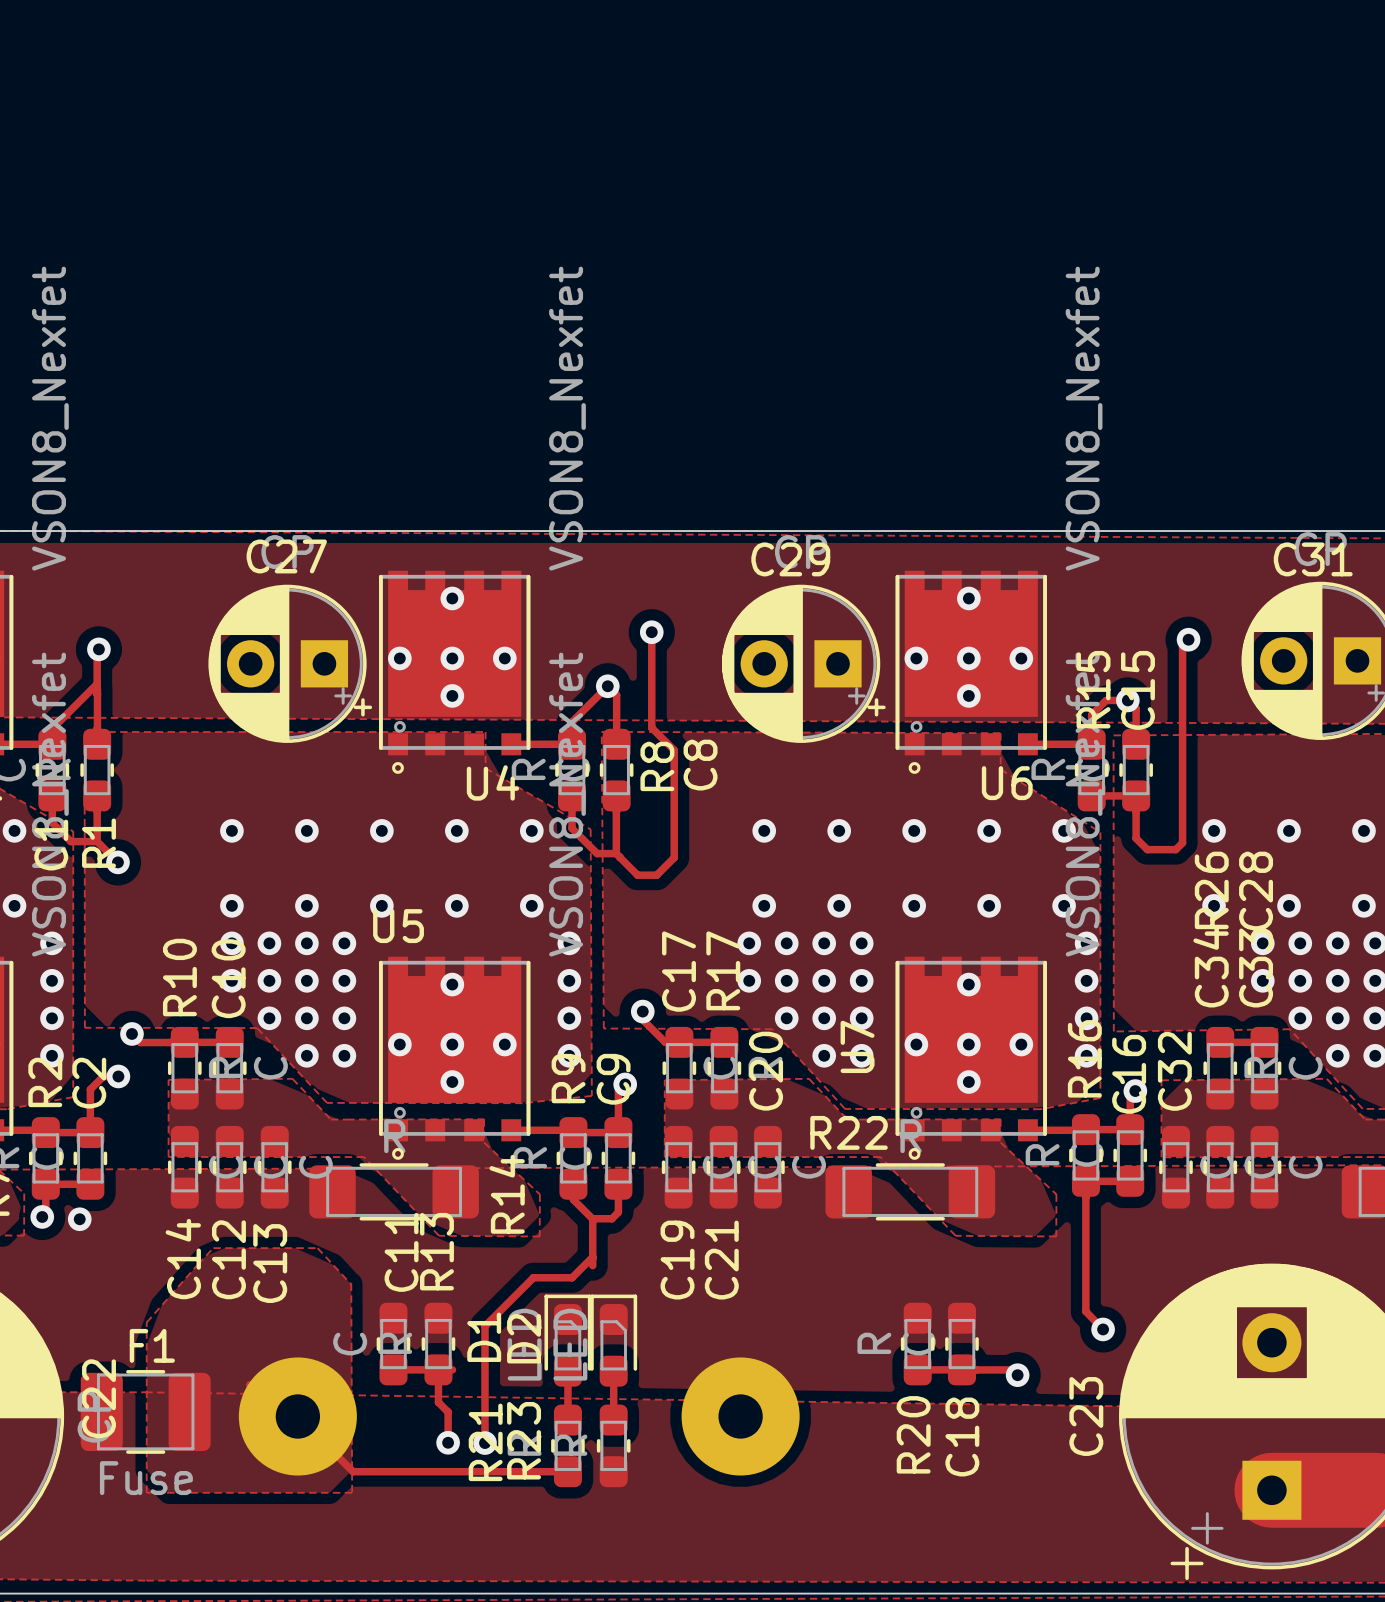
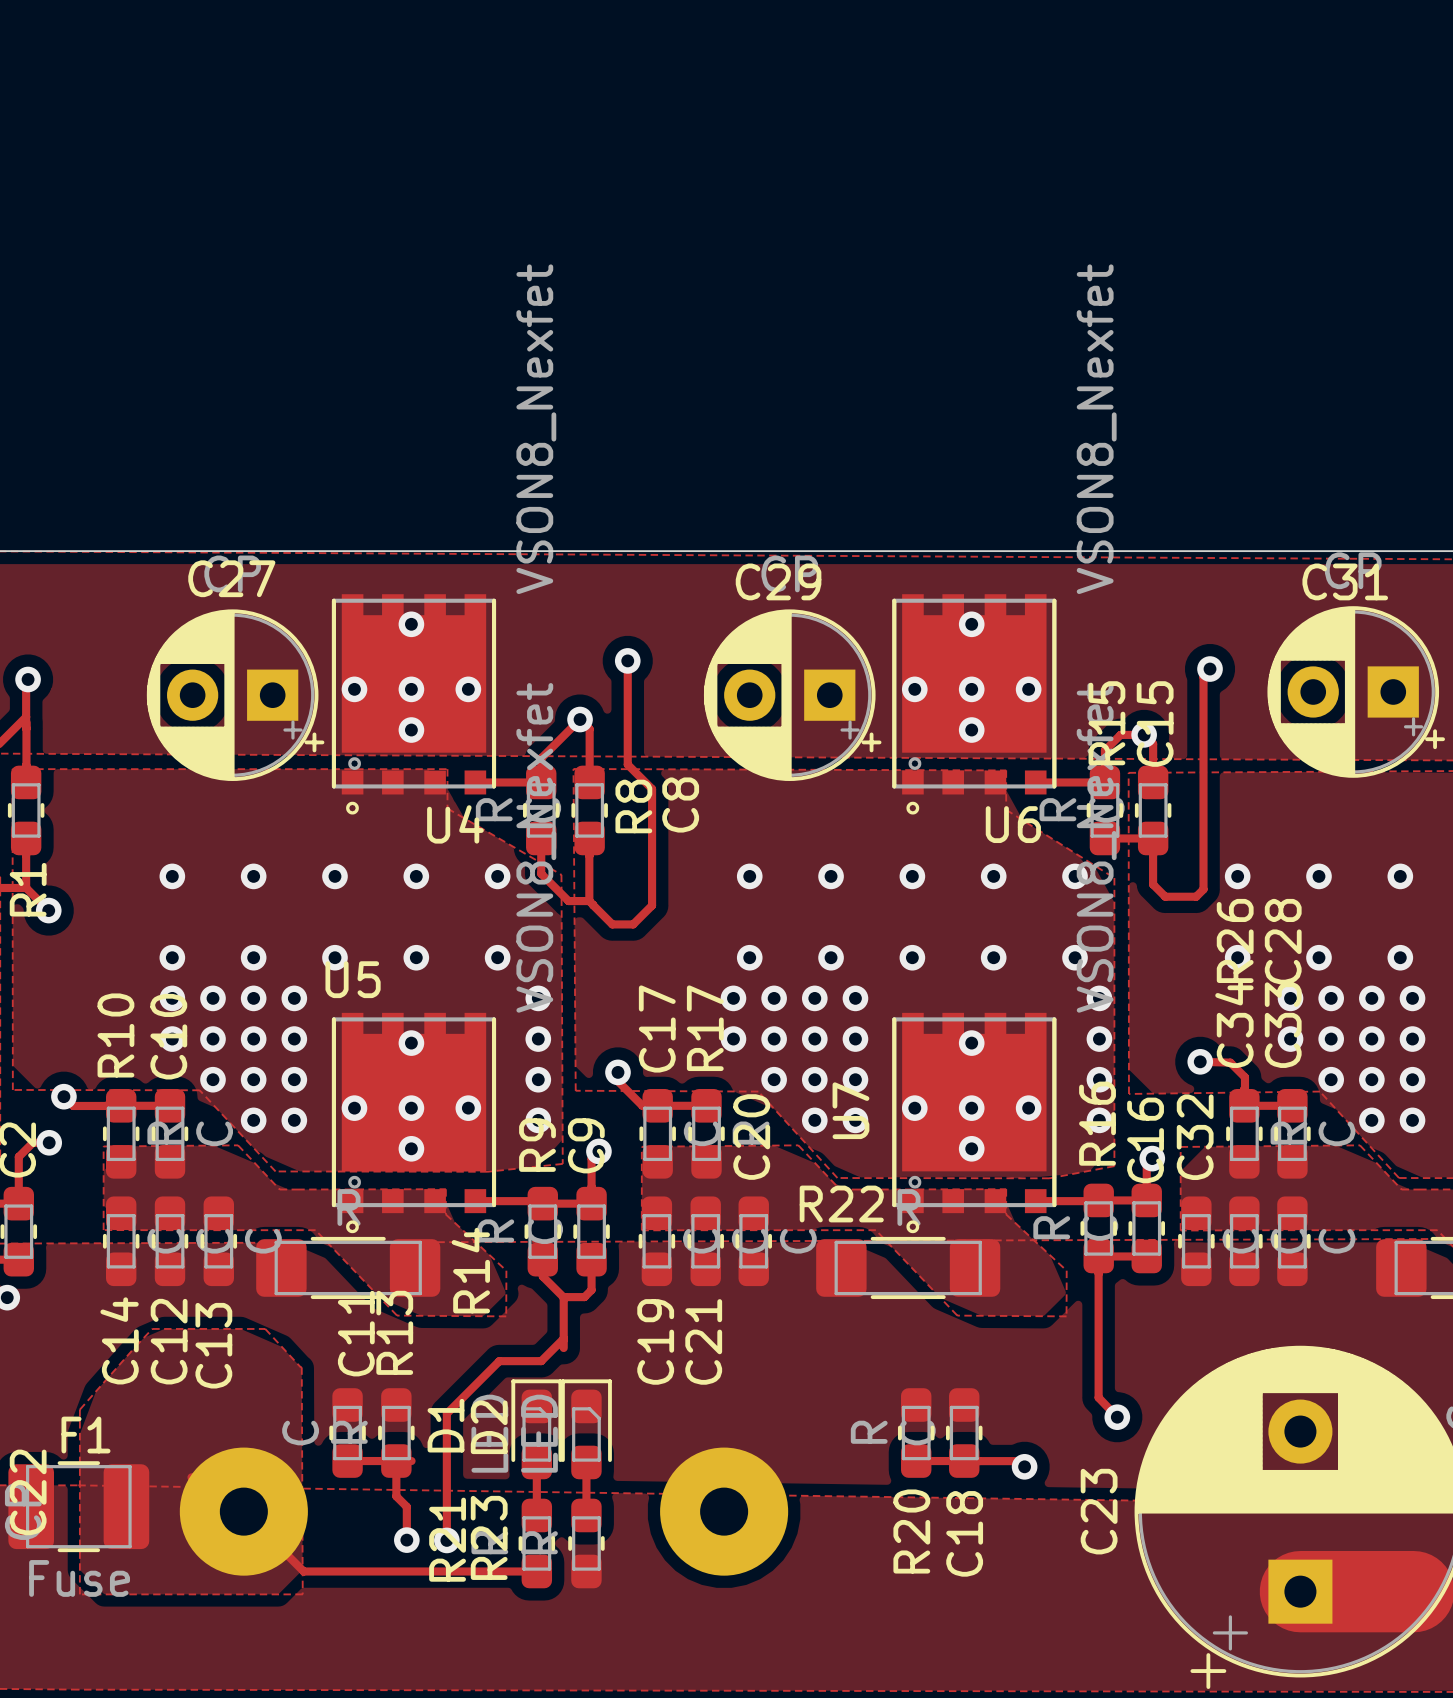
via: none -> (1200, 1061)
track: none -> (1201, 1062) (1230, 1062) (1244, 1077) (1244, 1105)

